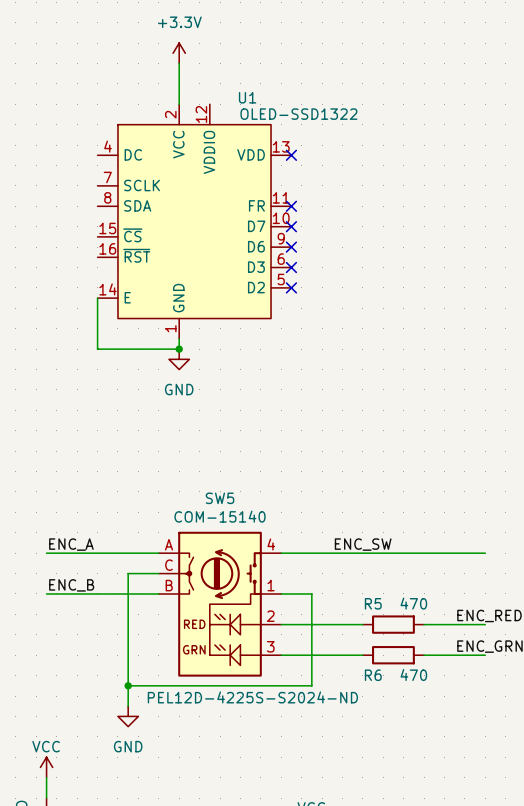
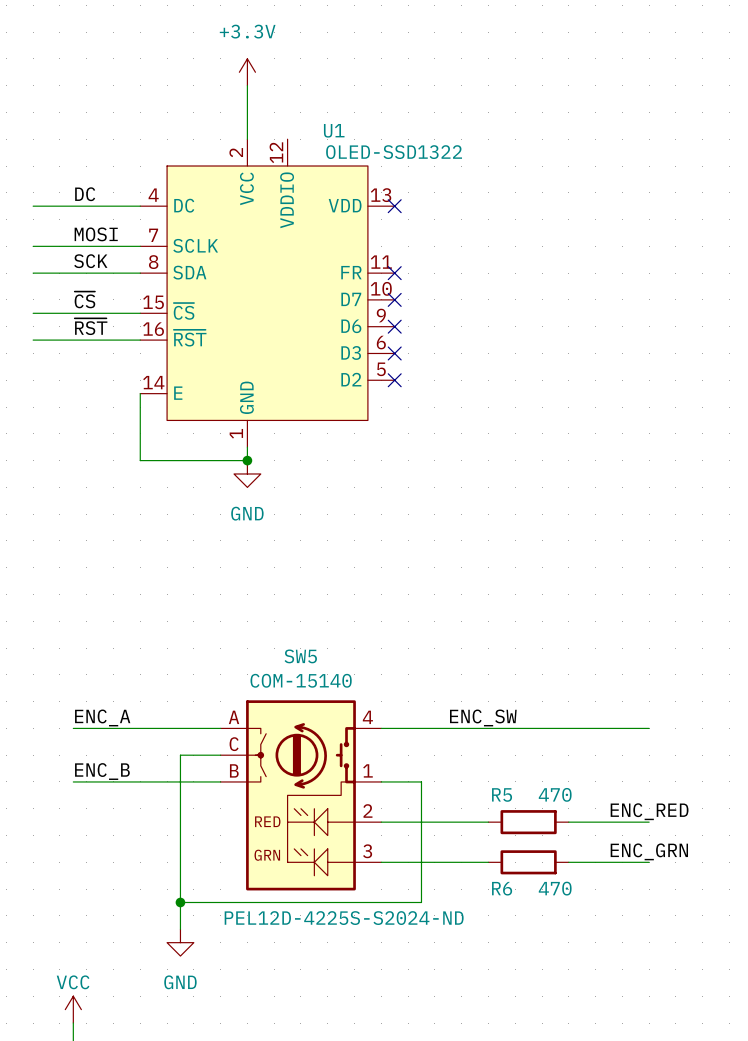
label: none -> DC (85, 194)
wire: none -> (33, 206) (140, 206)
label: none -> MOSI (96, 234)
wire: none -> (33, 246) (140, 246)
label: none -> SCK (90, 261)
wire: none -> (33, 273) (140, 273)
label: none -> ~{CS} (84, 299)
wire: none -> (33, 313) (140, 313)
label: none -> ~{RST} (91, 326)
wire: none -> (33, 340) (140, 340)

